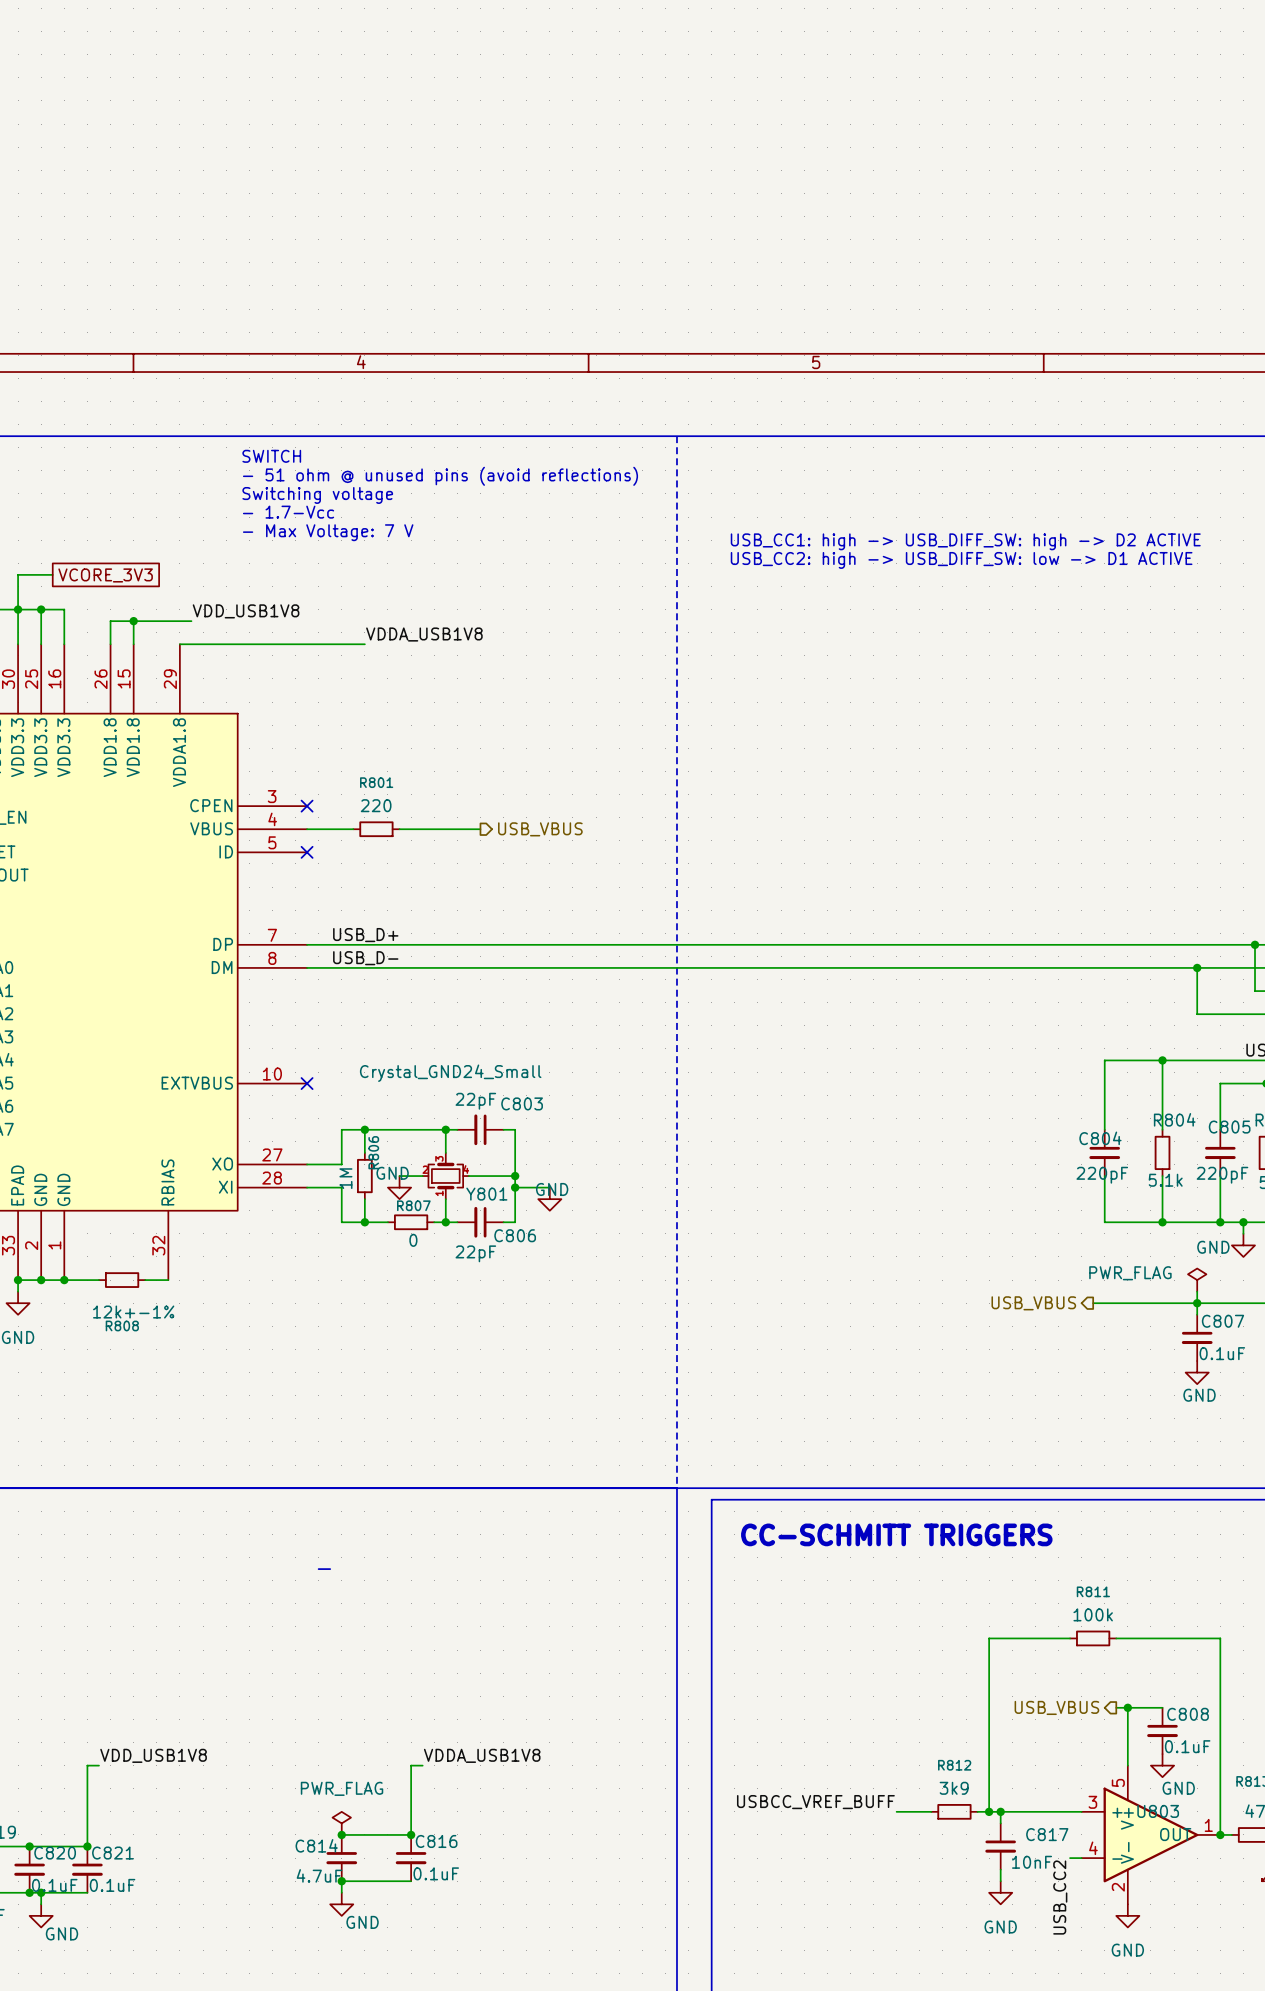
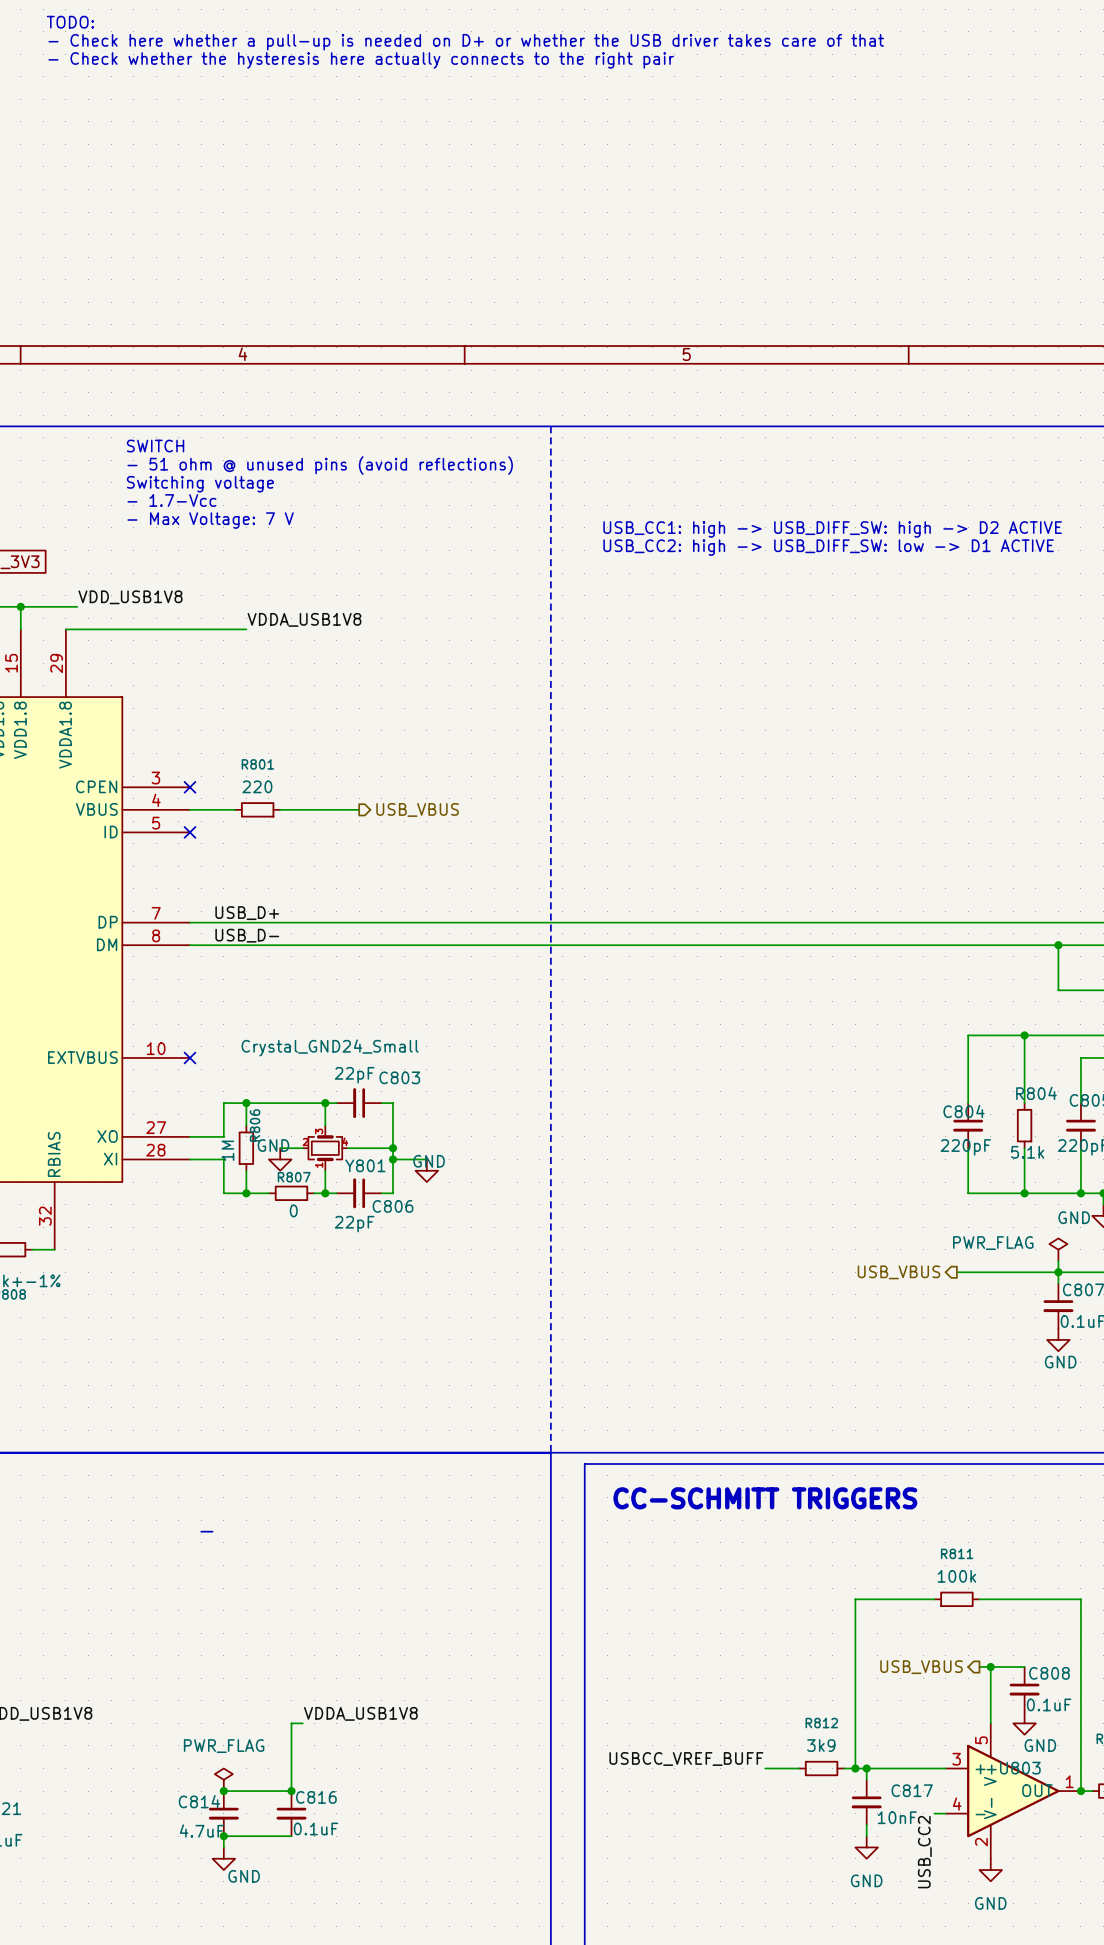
text: none -> TODO: (70, 22)
text: none -> - Check here whether a pull-up is needed on D+ or whether the USB driver takes care of that (466, 42)
text: none -> - Check whether the hysteresis here actually connects to the right pair (361, 60)

